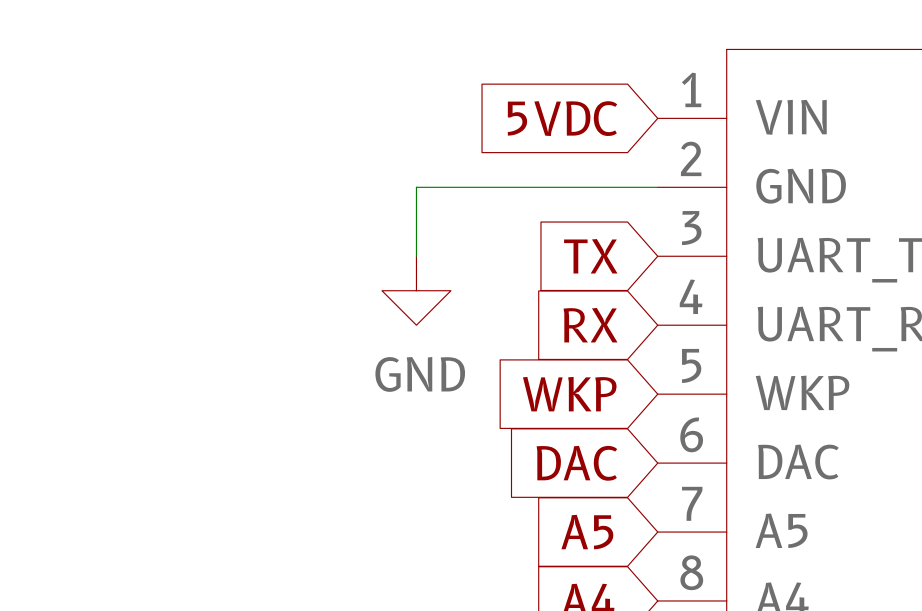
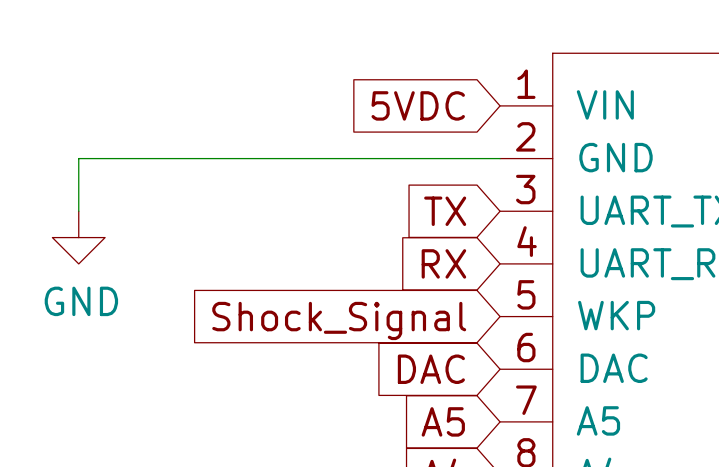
wire: (416, 187) (416, 256) -> (315, 158) (78, 158) (78, 211)
power symbol position: GND (416, 290) -> GND (78, 237)
global label: WKP (569, 394) -> Shock_Signal (339, 320)

